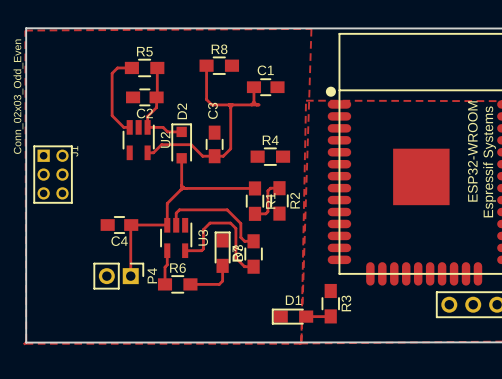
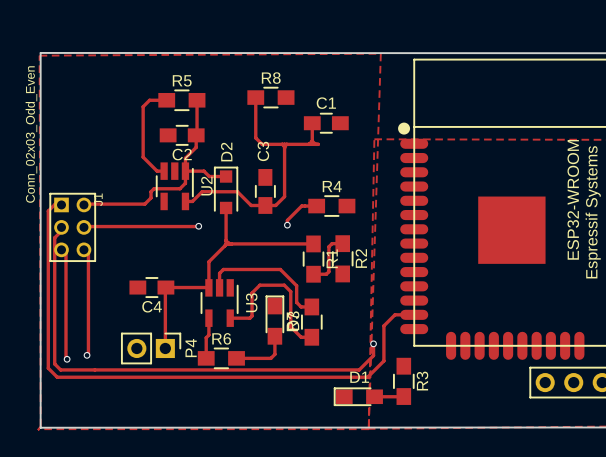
track: none -> (185, 171) (185, 183) (179, 188) (154, 188) (151, 191) (151, 197) (144, 204) (88, 204)
track: none -> (65, 204) (55, 204) (48, 211) (48, 368) (57, 377) (367, 377) (383, 360) (383, 325) (394, 314) (414, 314)
track: none -> (316, 206) (301, 206) (287, 220) (287, 225)
via: none -> (287, 225)
track: none -> (65, 226) (54, 237) (54, 364) (60, 369) (359, 369) (373, 355) (373, 343)
track: none -> (198, 226) (88, 226)
via: none -> (198, 226)
track: none -> (65, 249) (67, 359)
track: none -> (88, 249) (87, 355)
via: none -> (373, 343)
via: none -> (87, 355)
via: none -> (67, 359)

